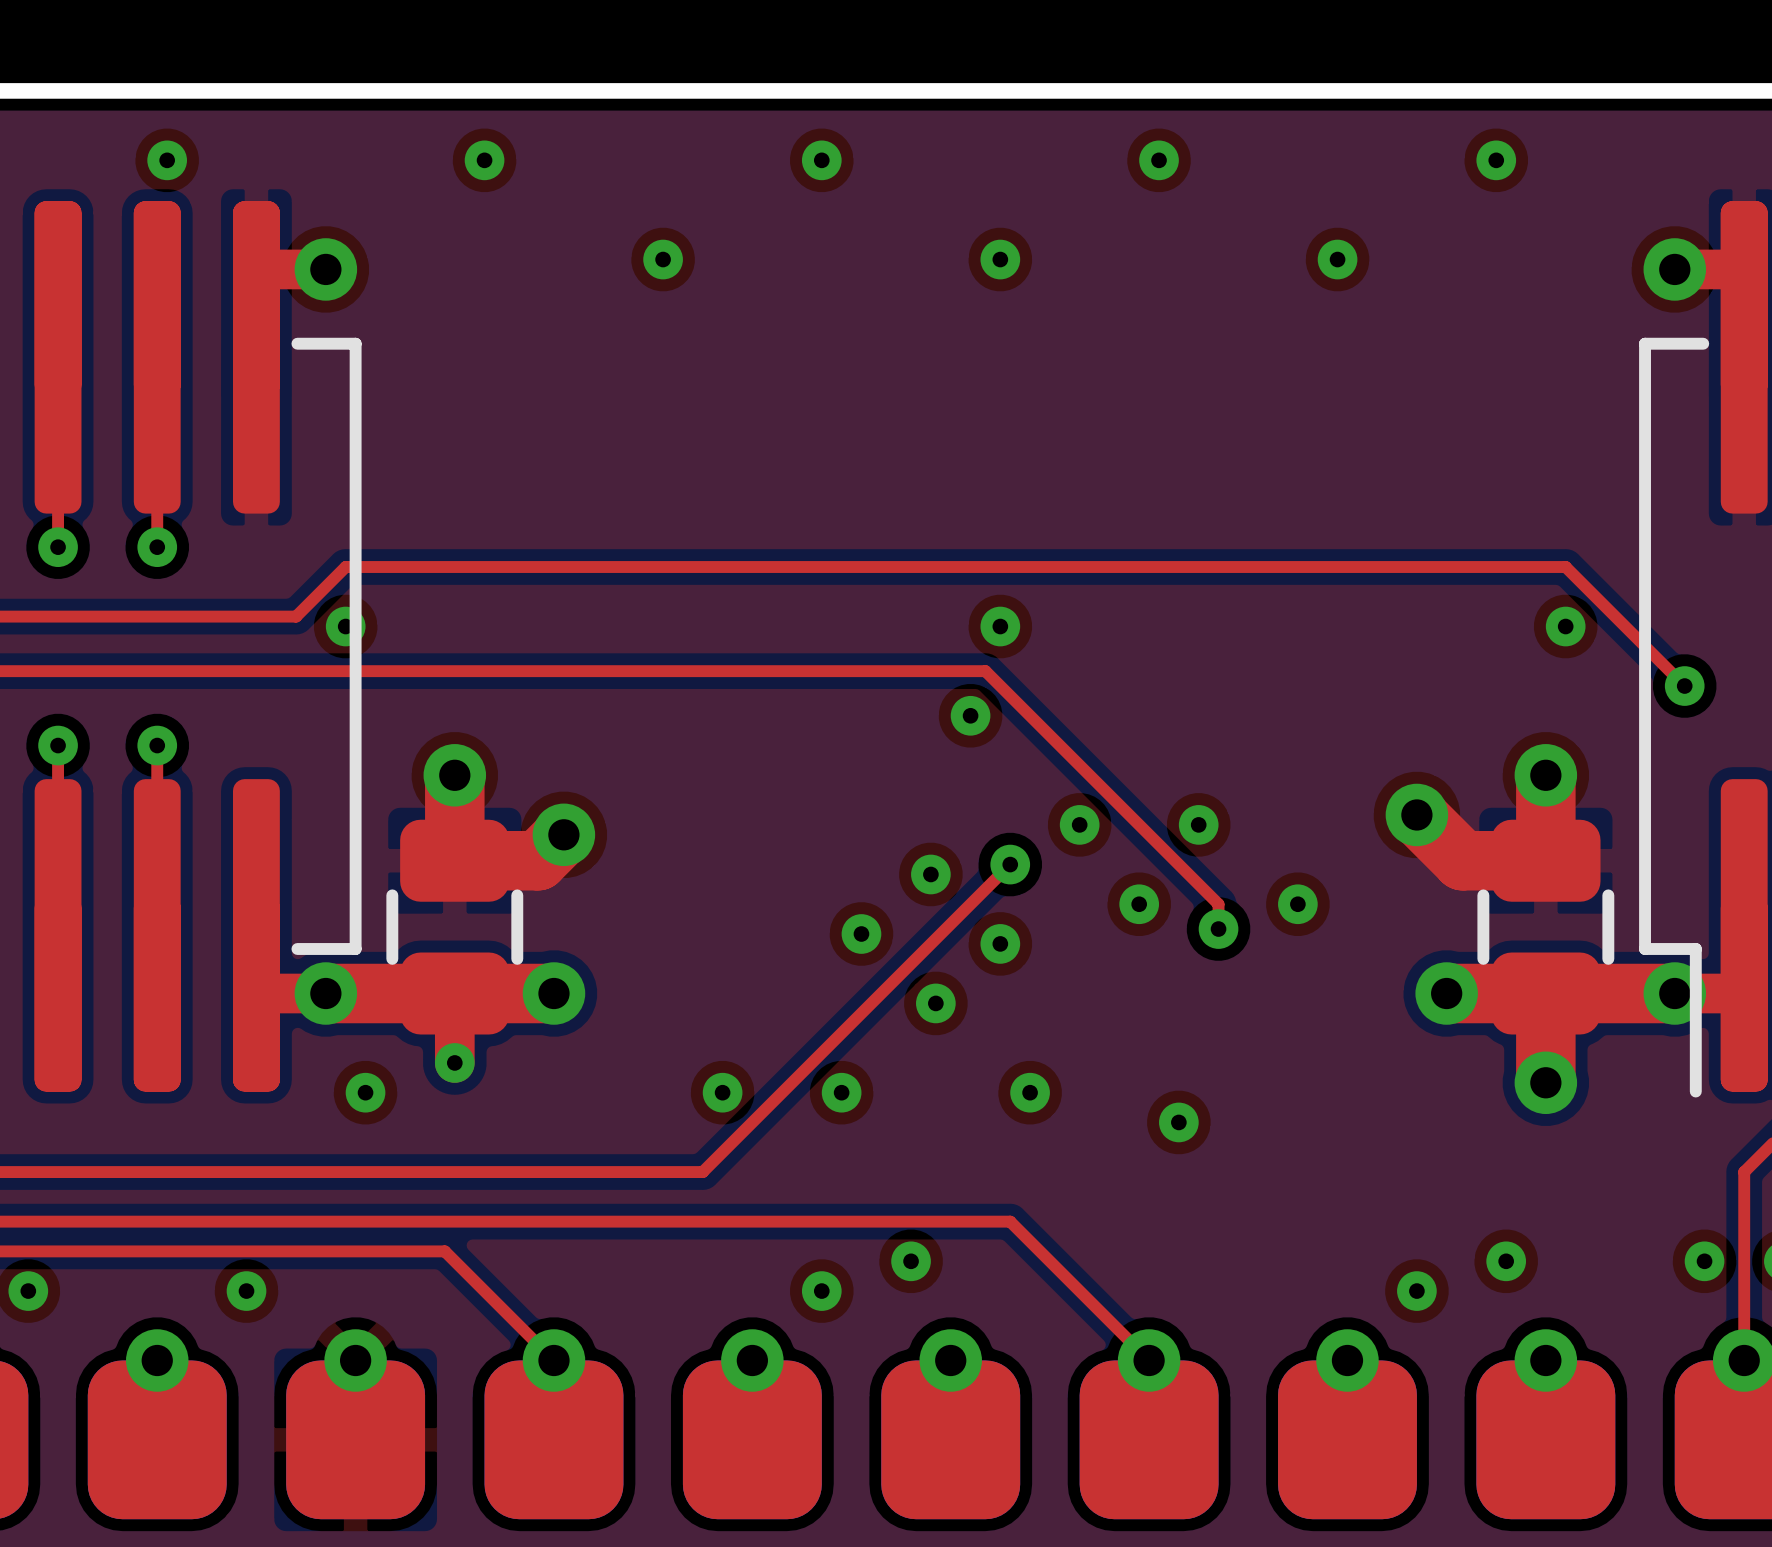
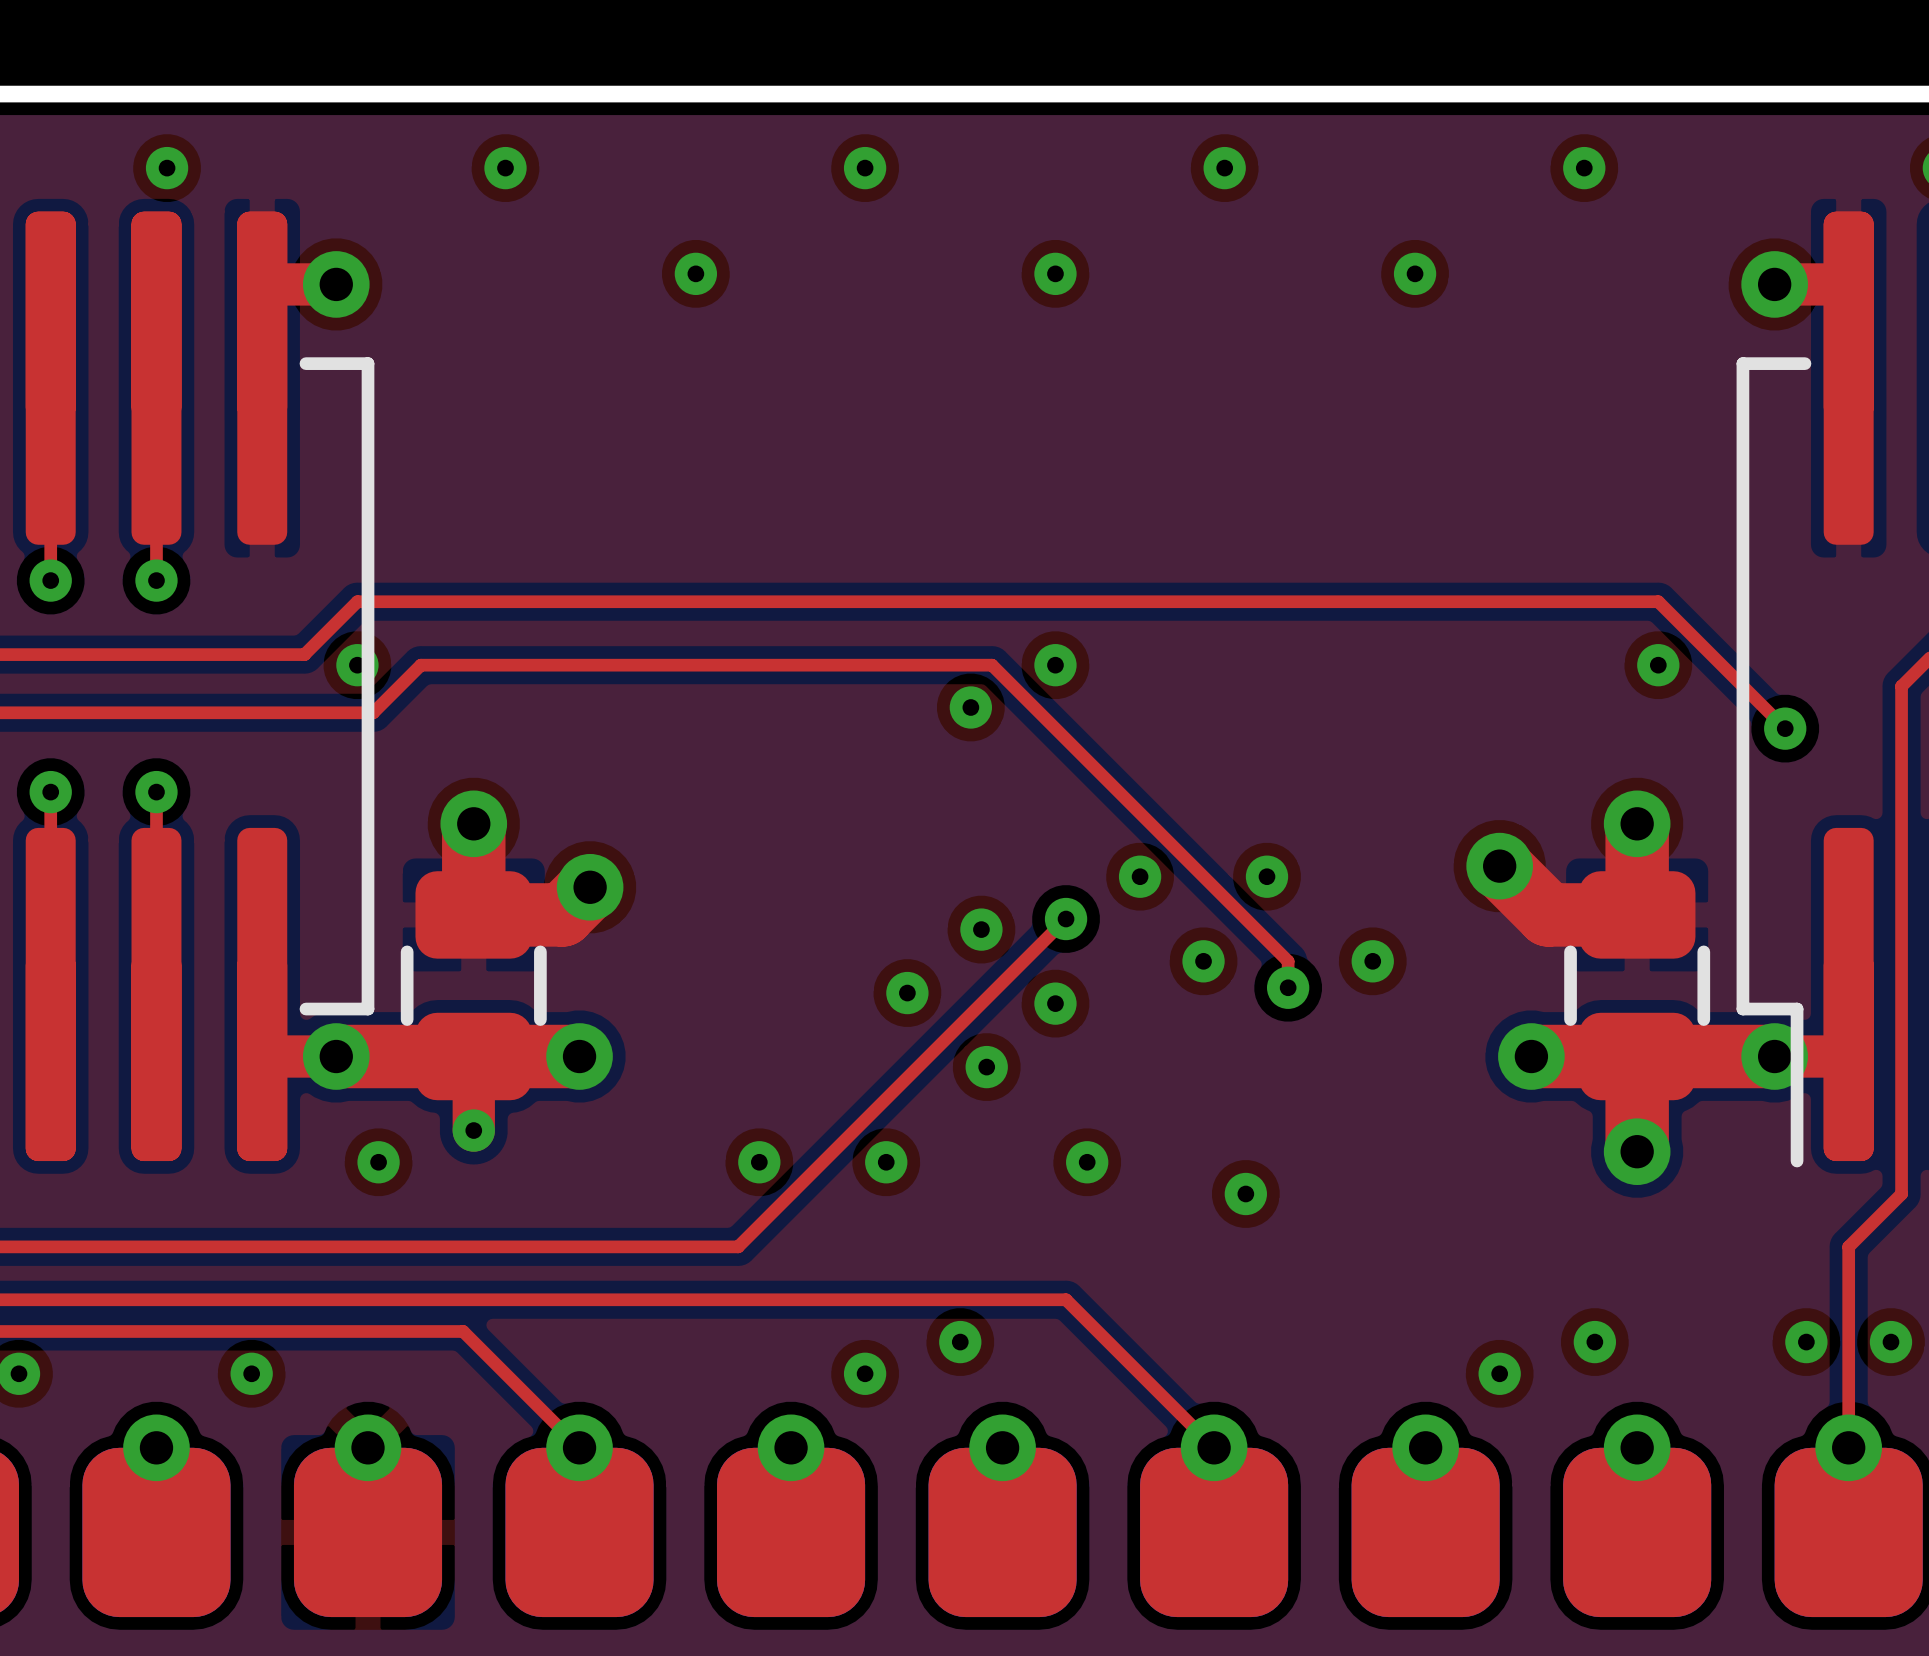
top track: (360, 671) (985, 671) -> (373, 712) (420, 665) (992, 665) (1039, 712)
via position: (970, 715) -> (970, 707)

